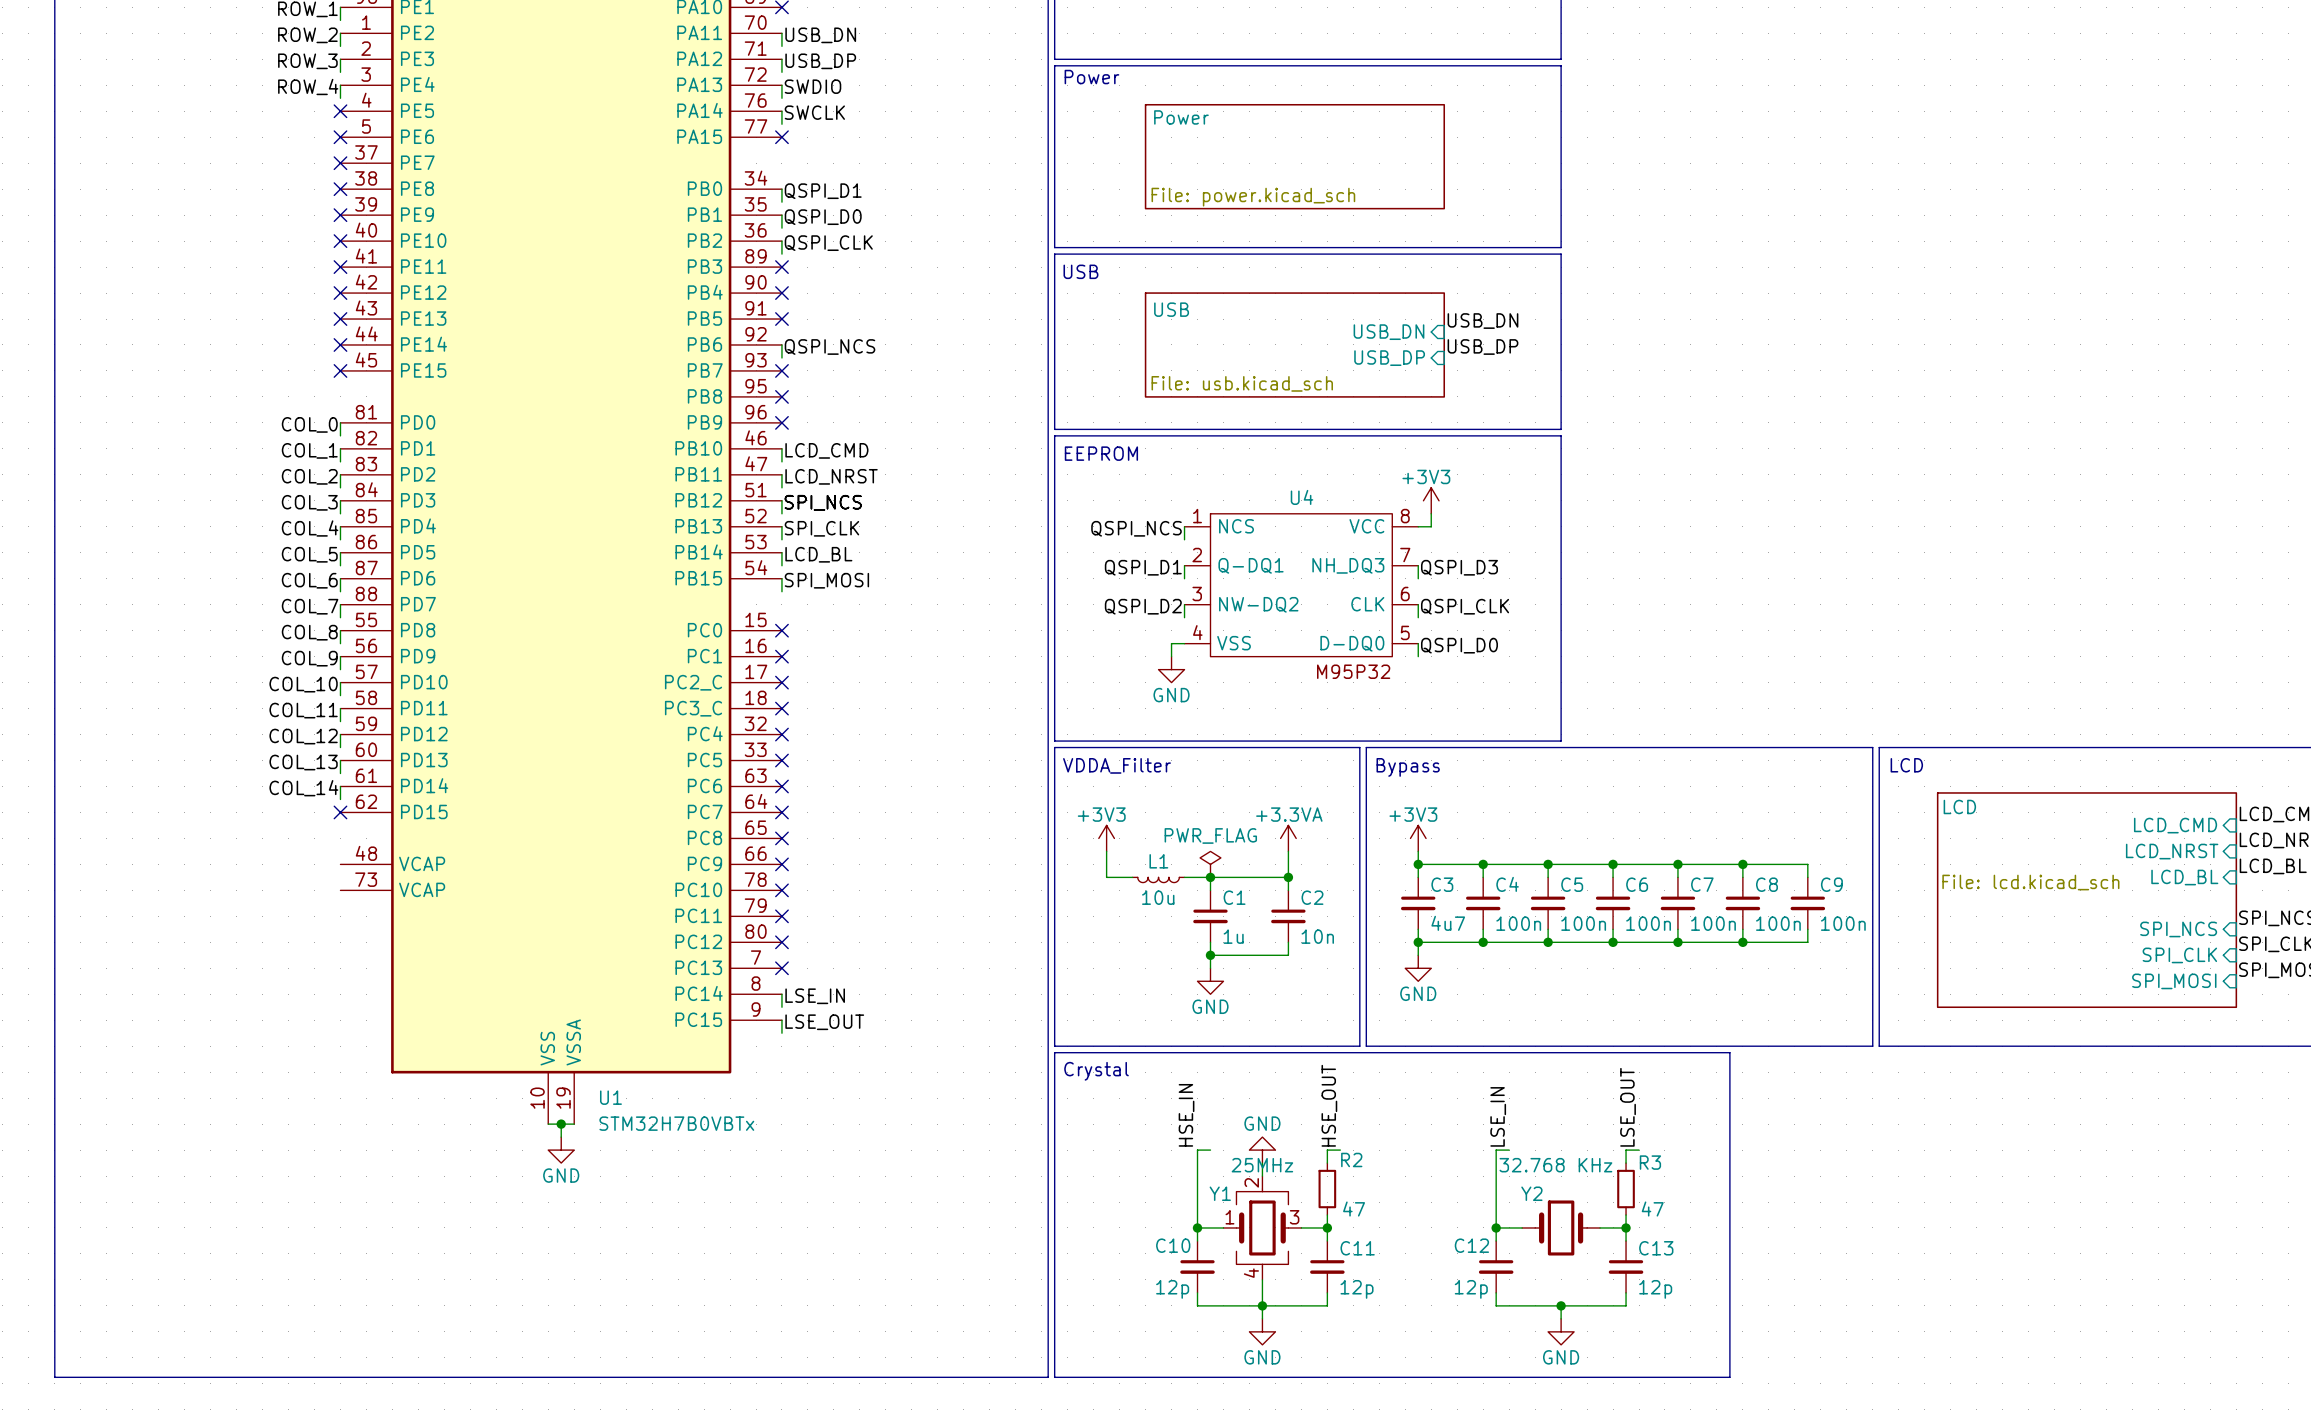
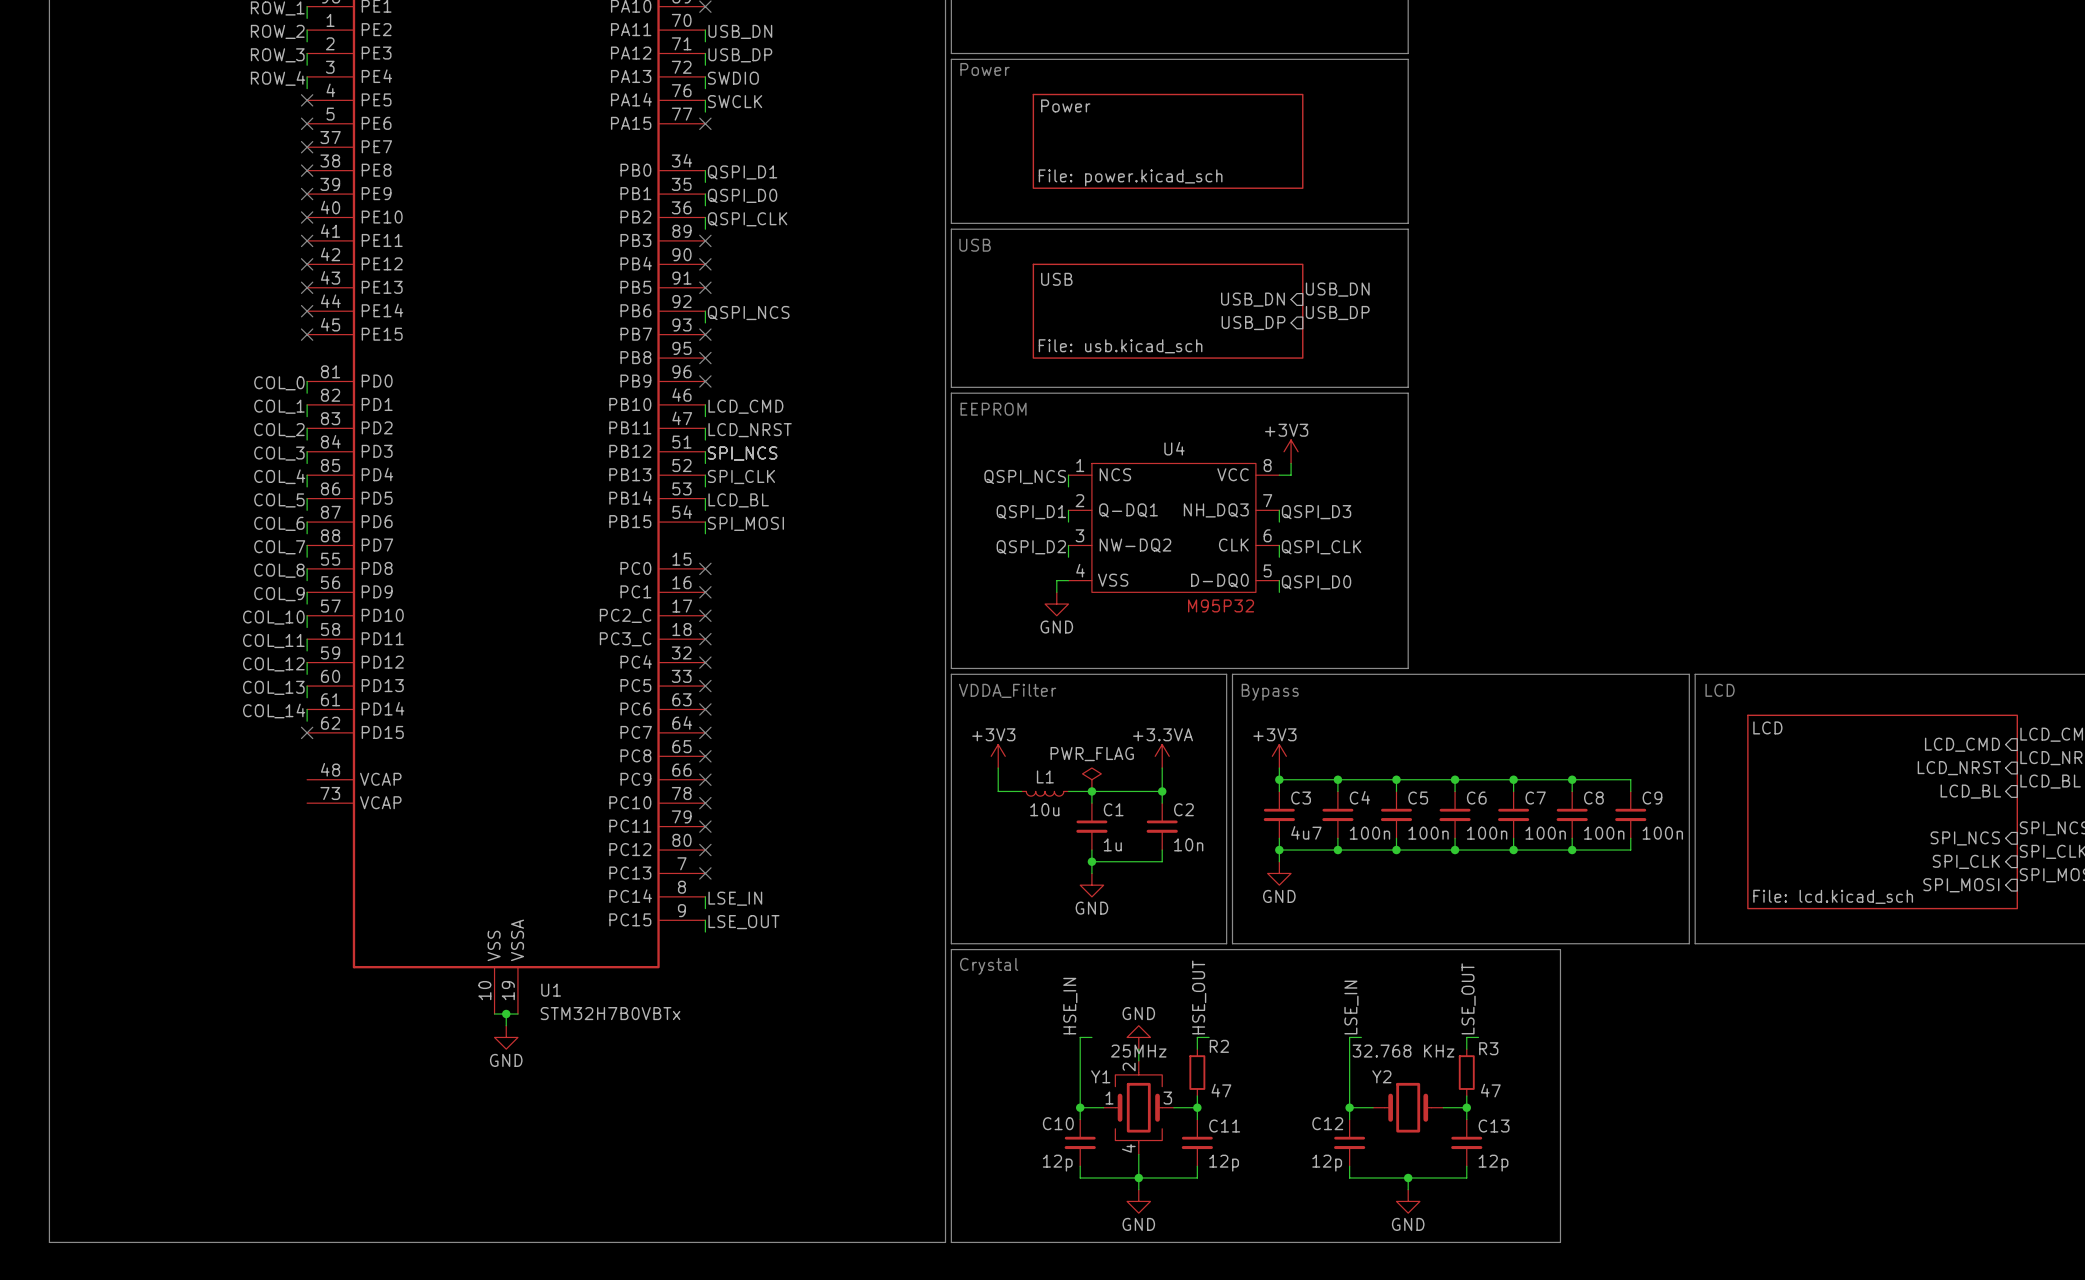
sheet LCD value position: File: lcd.kicad_sch (2030, 882) -> File: lcd.kicad_sch (1833, 896)

